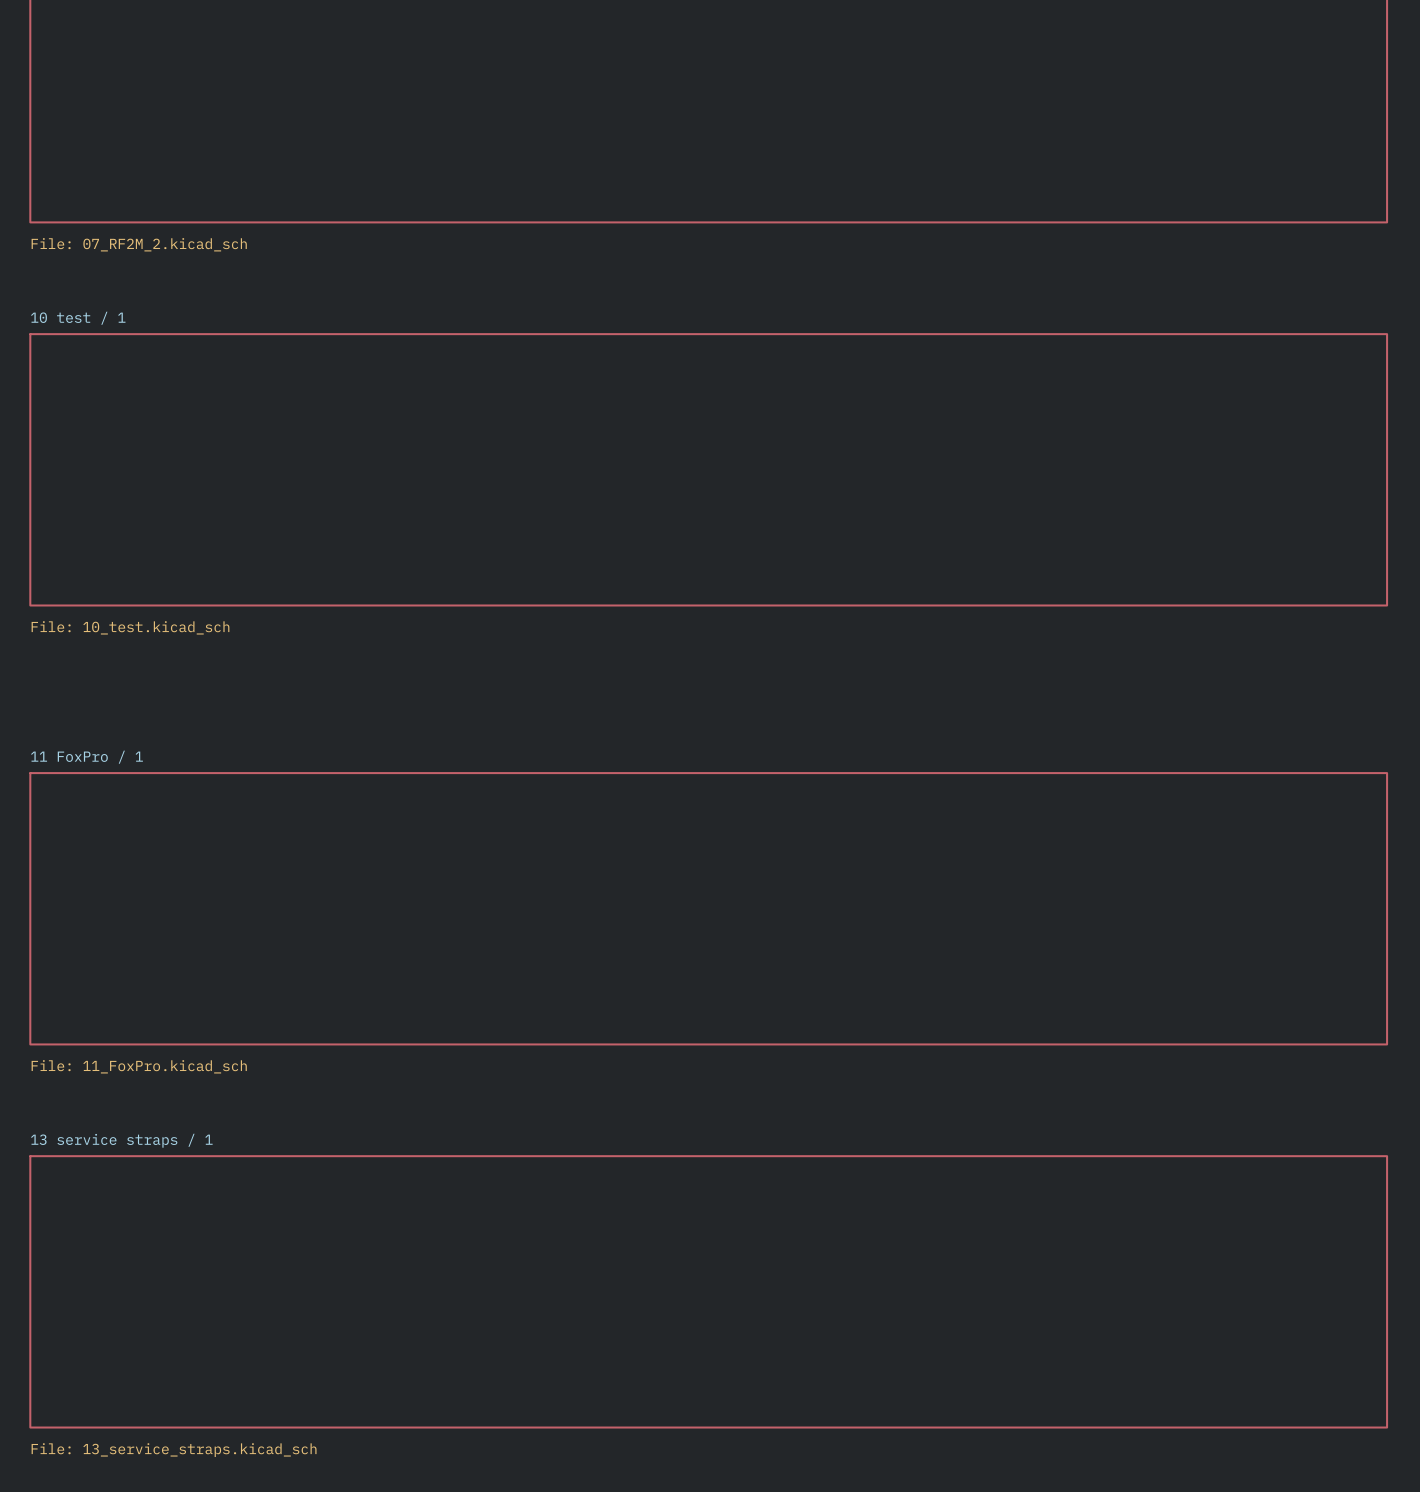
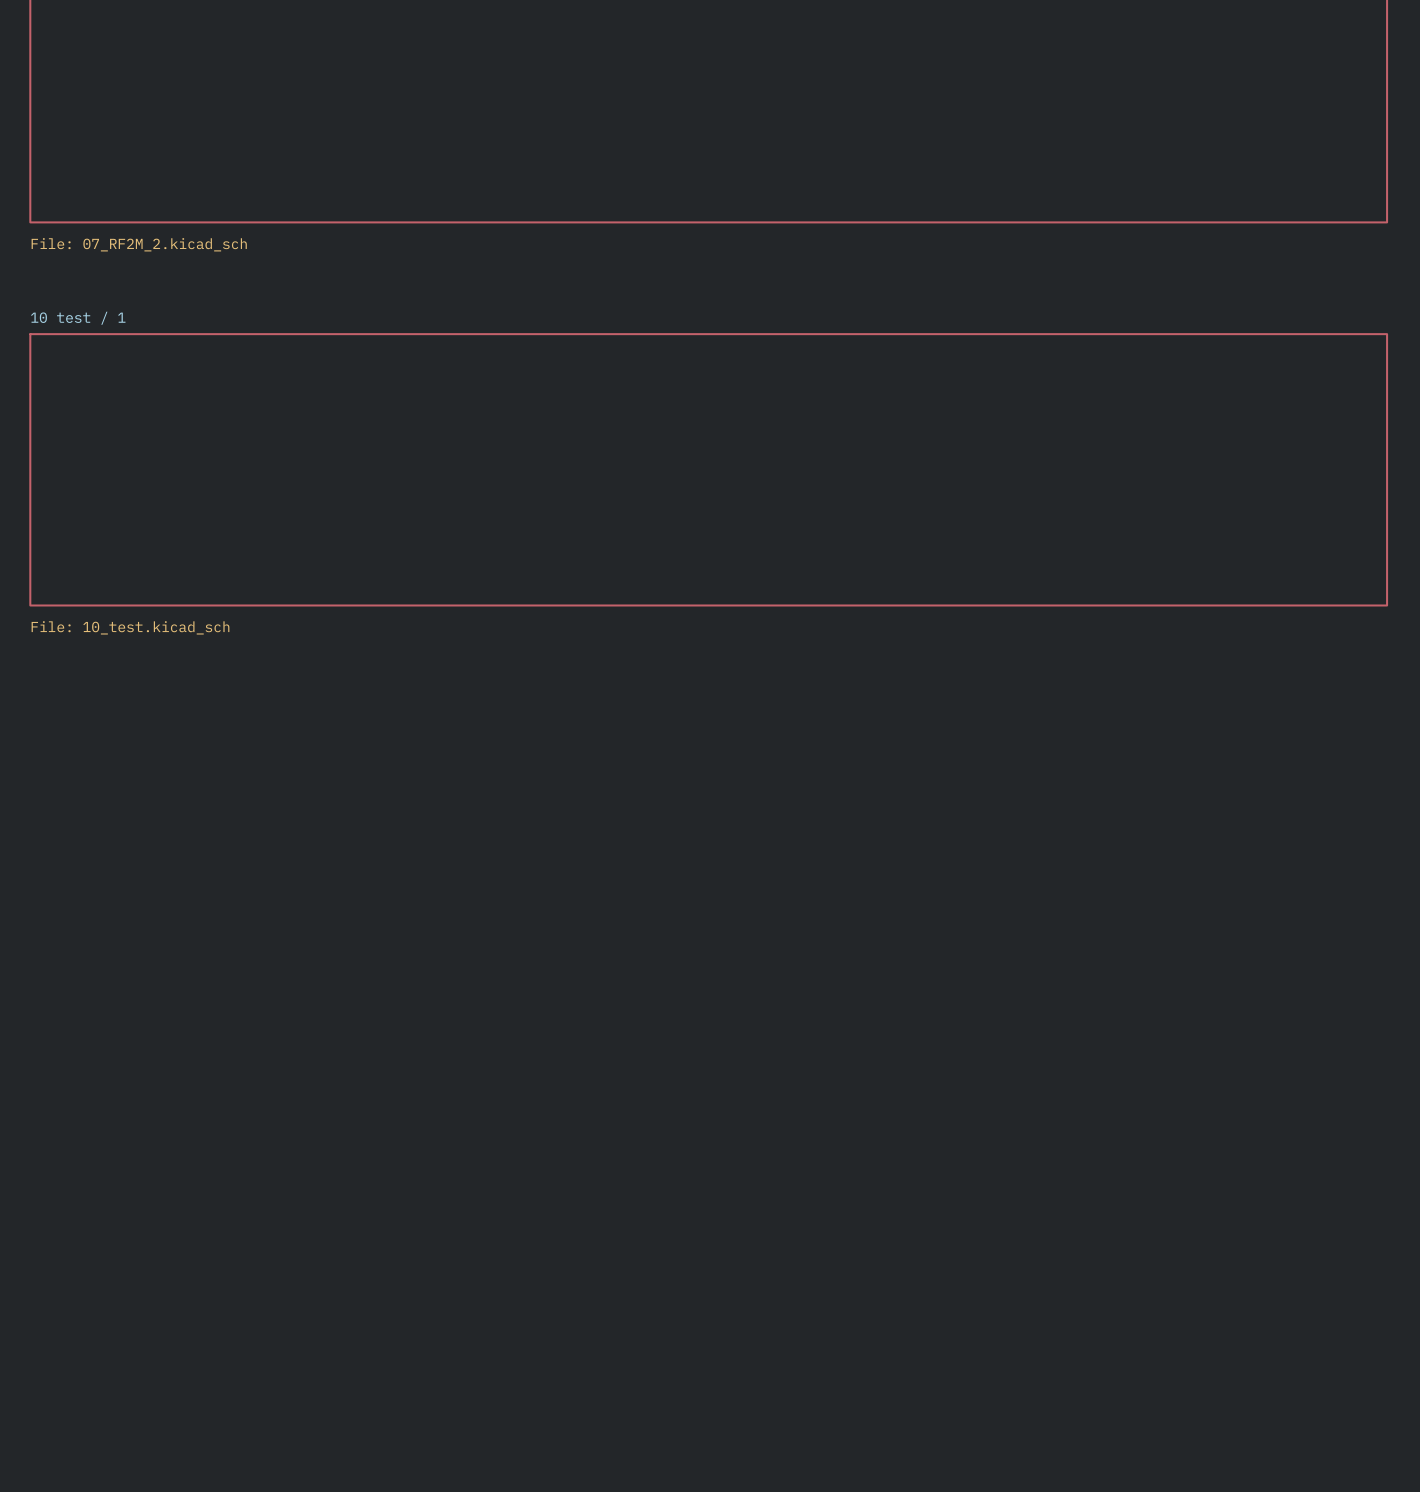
sheet 11 FoxPro / 1: File: 11_FoxPro.kicad_sch (708, 908) -> none
sheet 13 service straps / 1: File: 13_service_straps.kicad_sch (708, 1291) -> none

